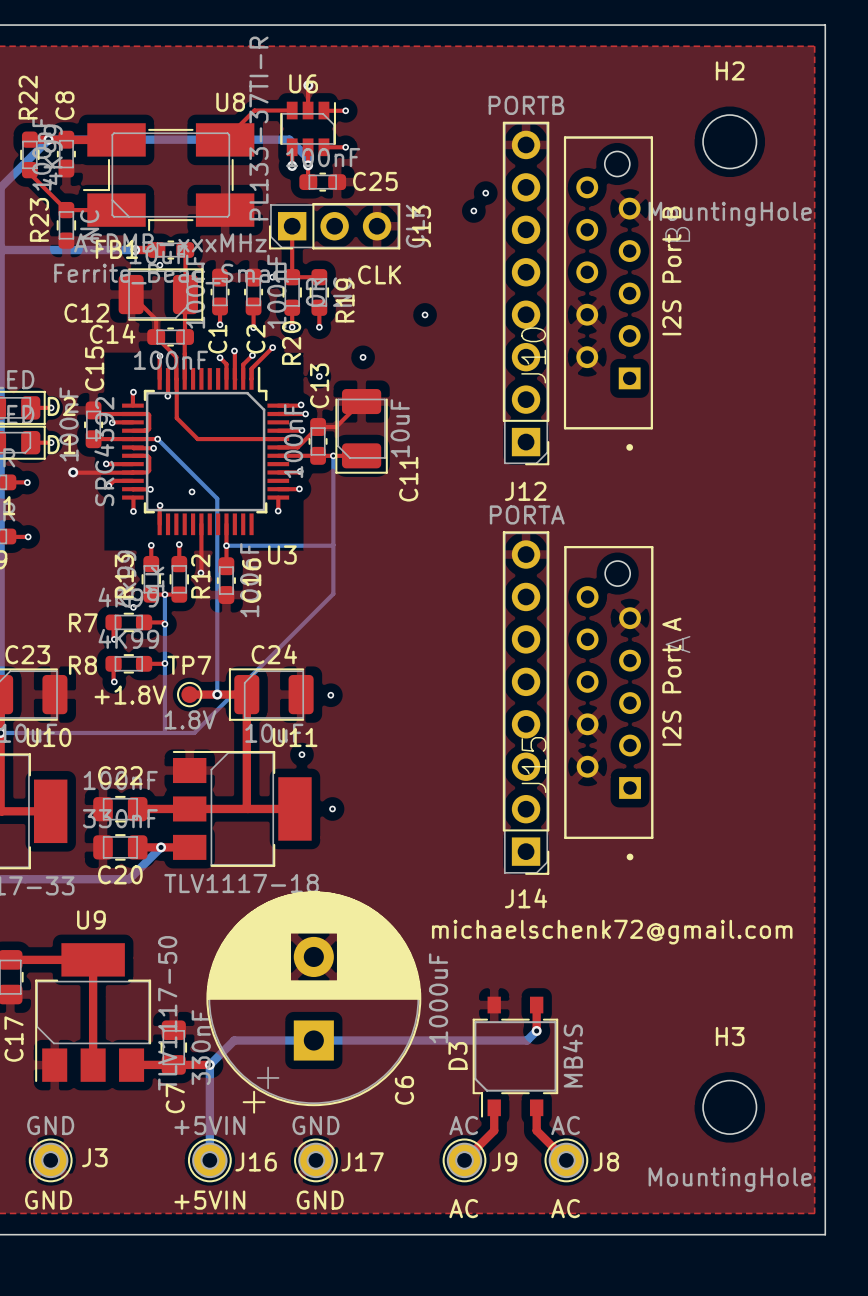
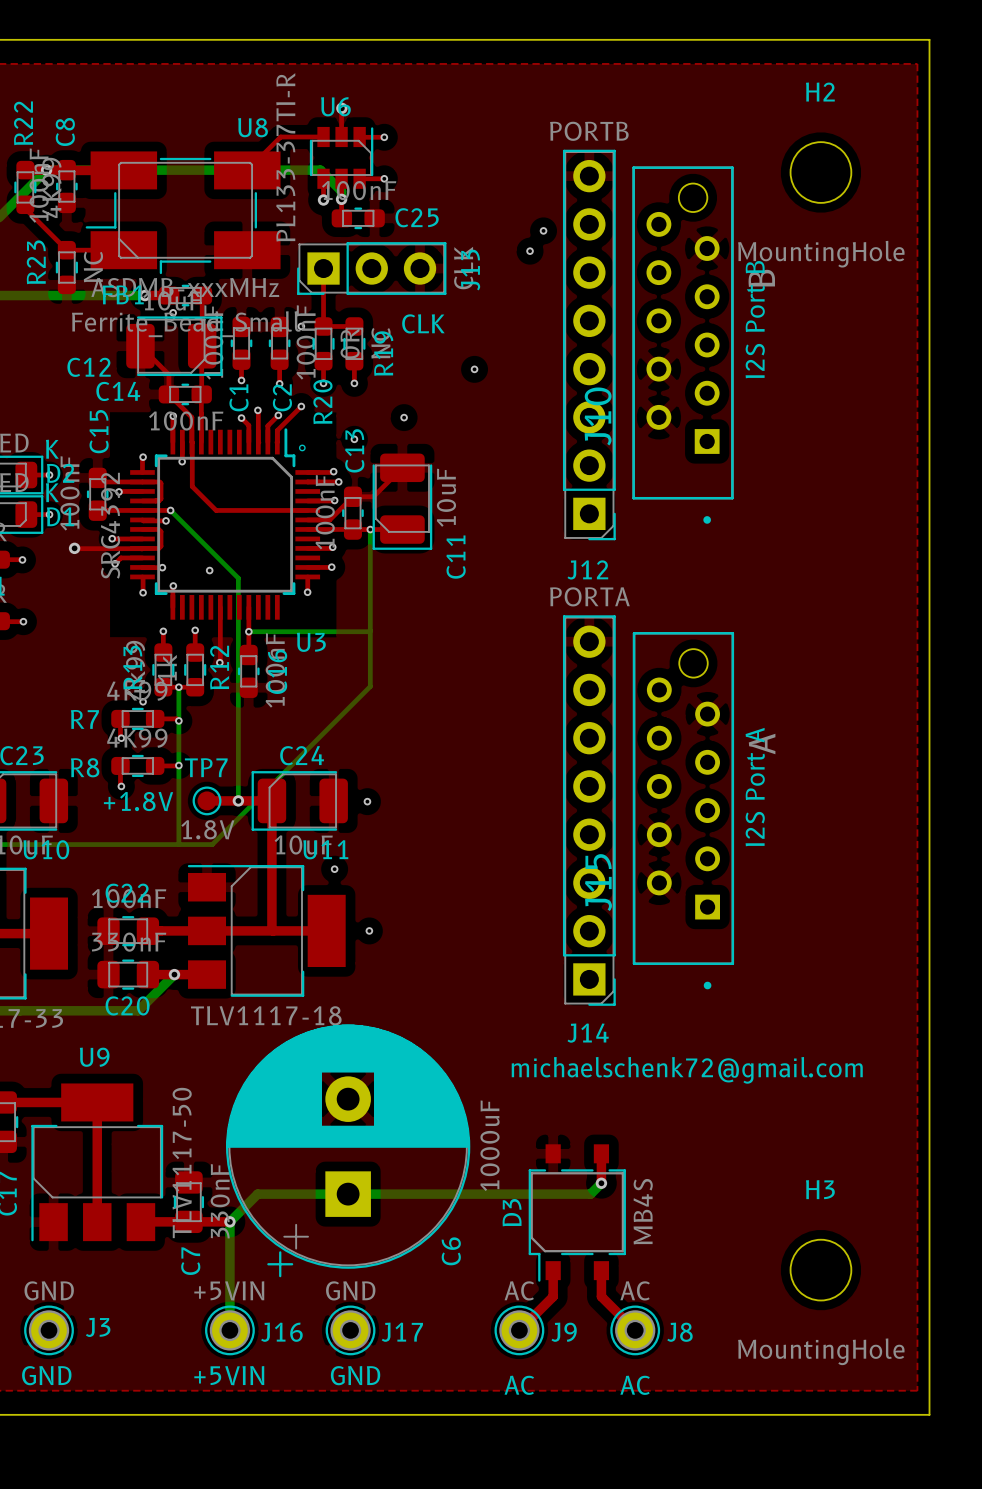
text: none -> ° (302, 447)
text: none -> K (52, 449)
text: none -> K (52, 492)

